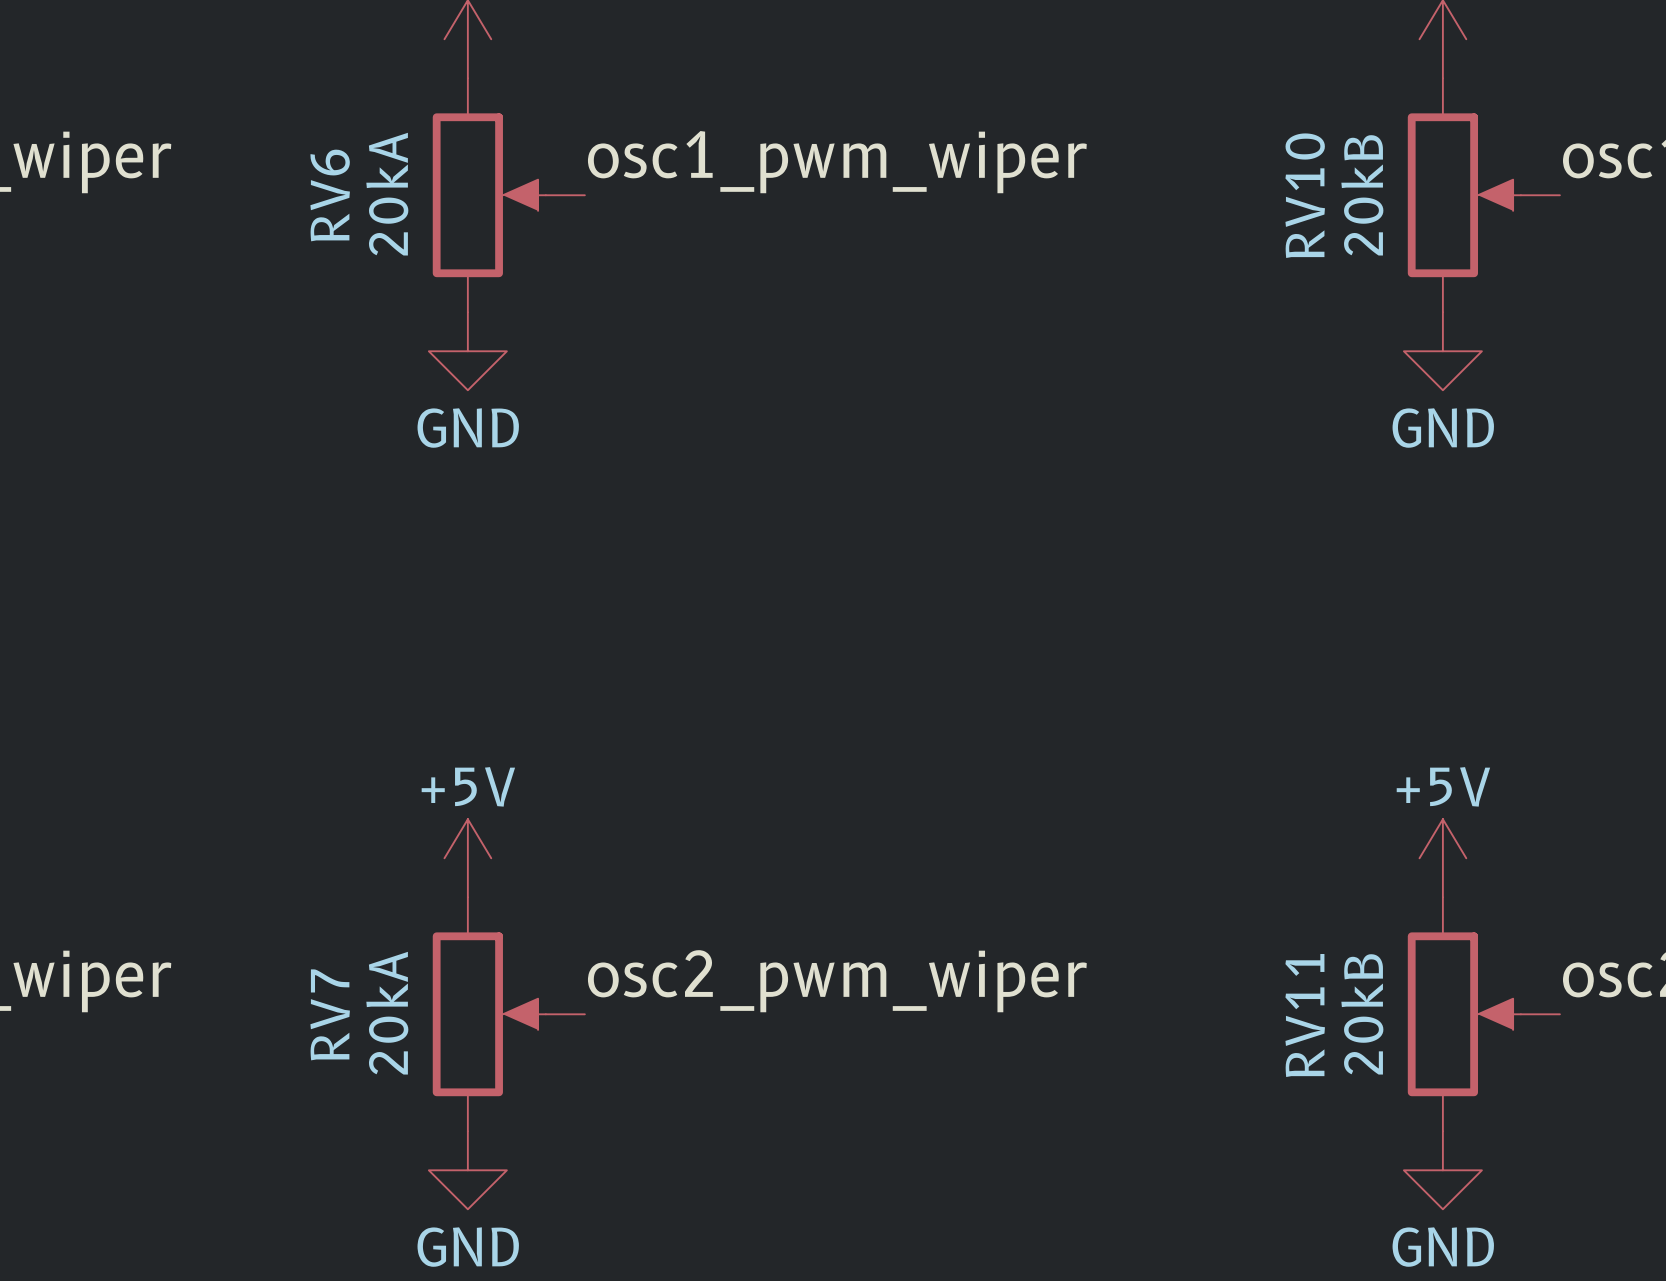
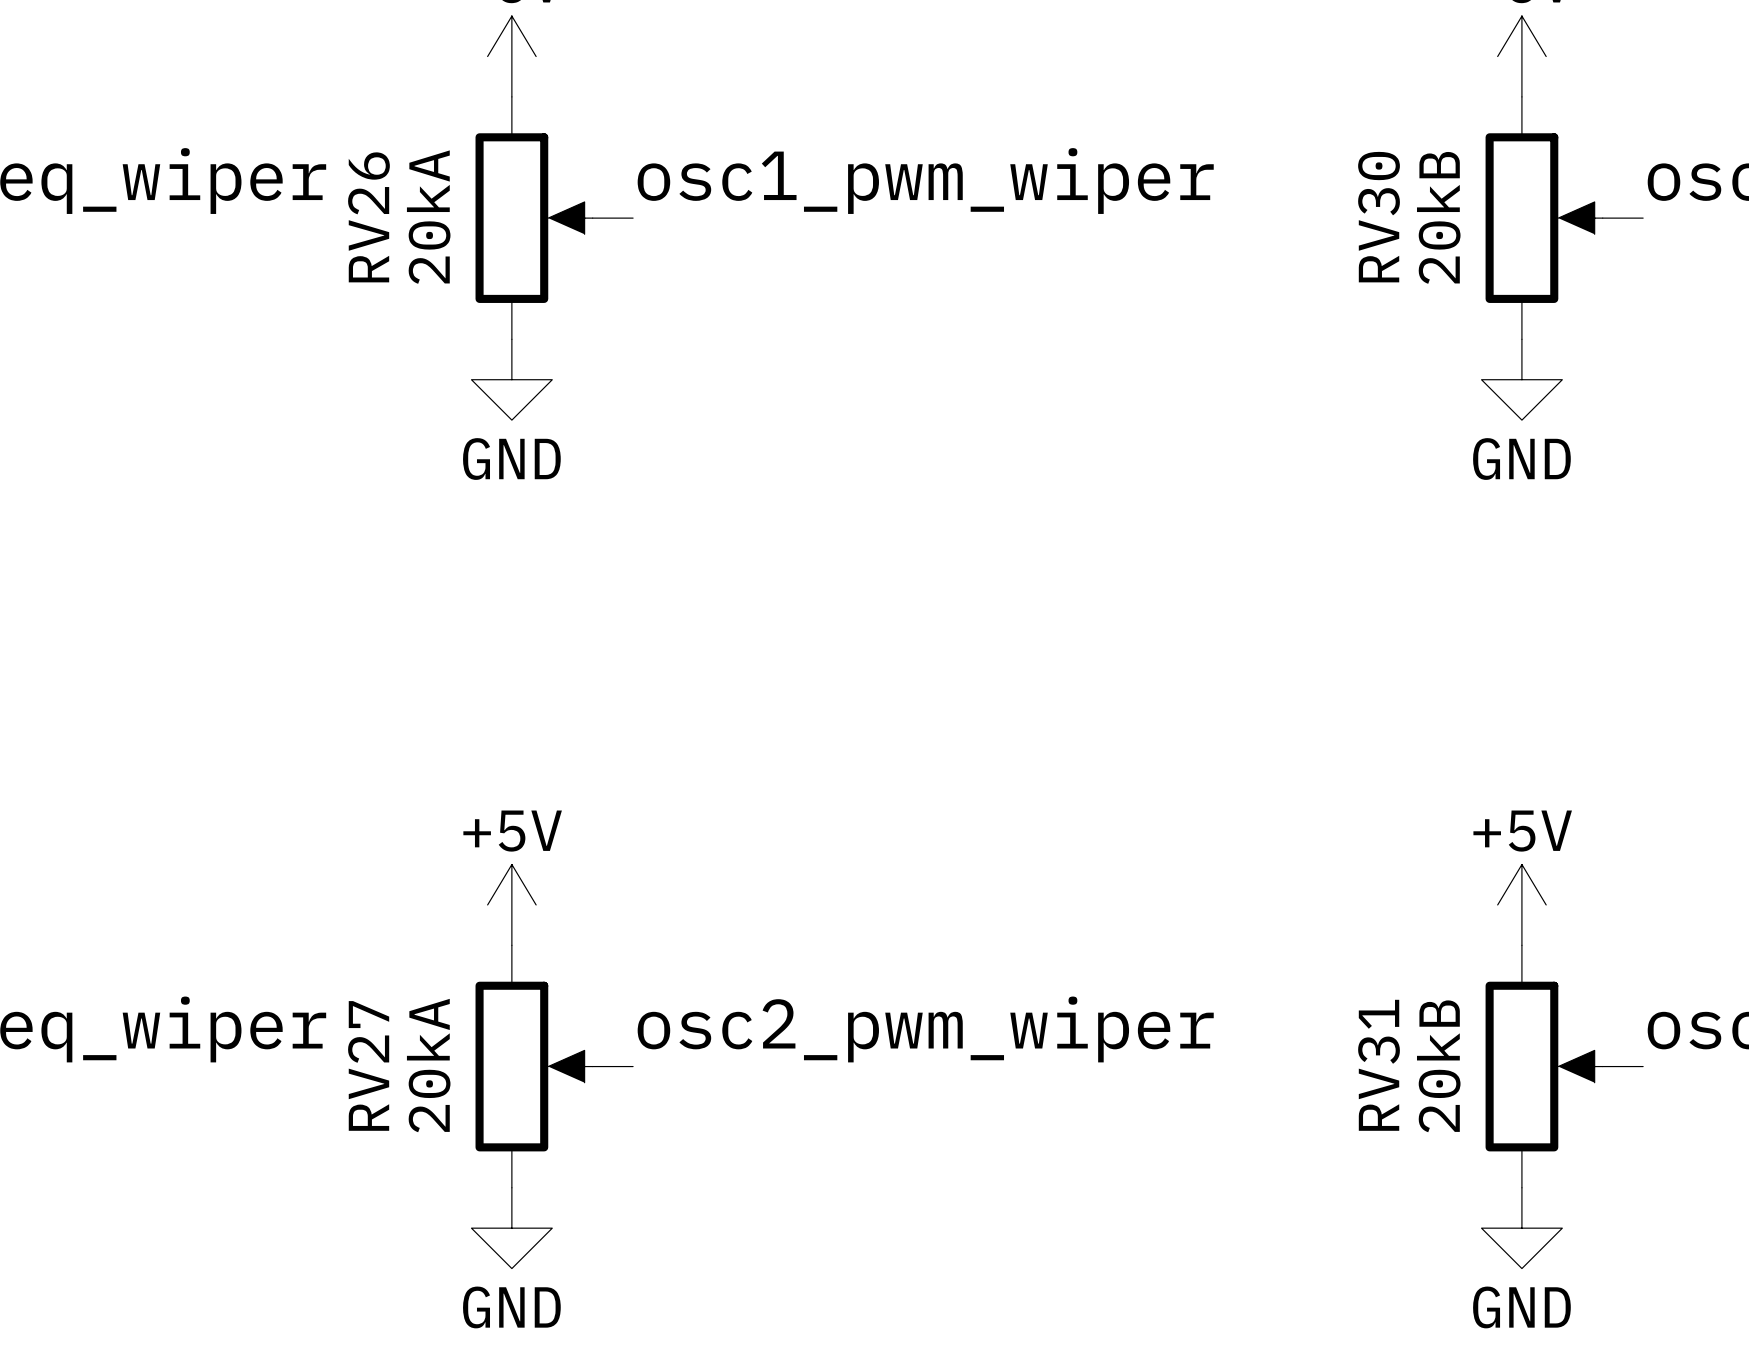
RV6 name: RV6 (330, 195) -> RV26 (368, 217)
RV10 name: RV10 (1305, 195) -> RV30 (1379, 217)
RV7 name: RV7 (330, 1014) -> RV27 (368, 1065)
RV11 name: RV11 (1305, 1015) -> RV31 (1379, 1065)

